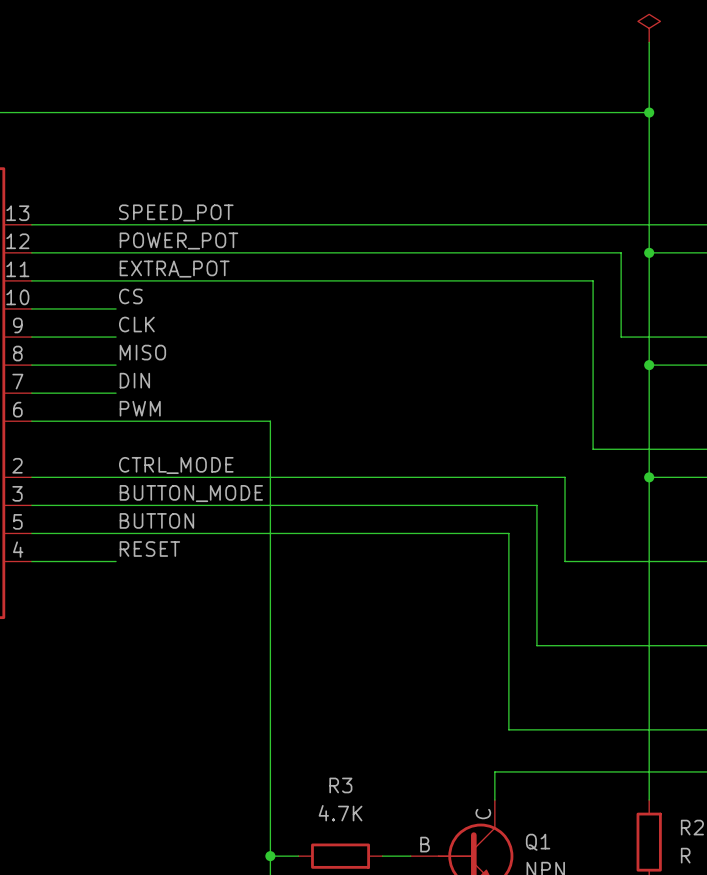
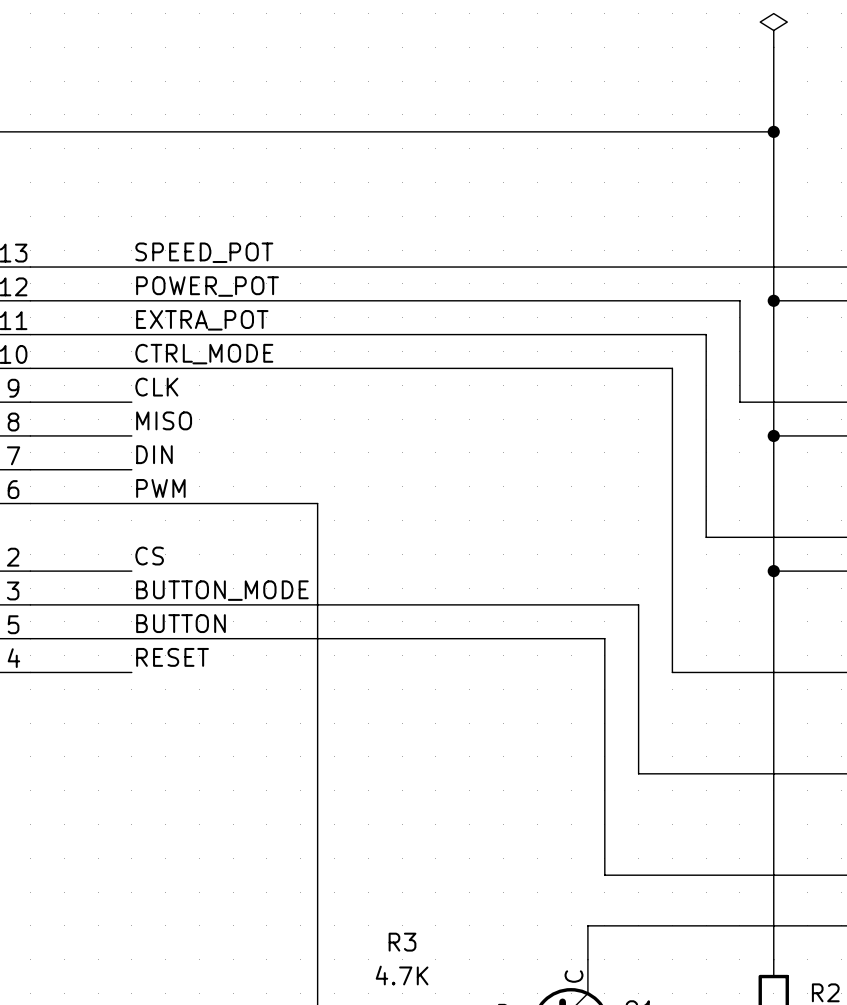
label: CS (130, 296) -> CTRL_MODE (204, 354)
label: CTRL_MODE (176, 465) -> CS (149, 556)
wire: (116, 477) (565, 477) -> (131, 368) (672, 368) (672, 571)

